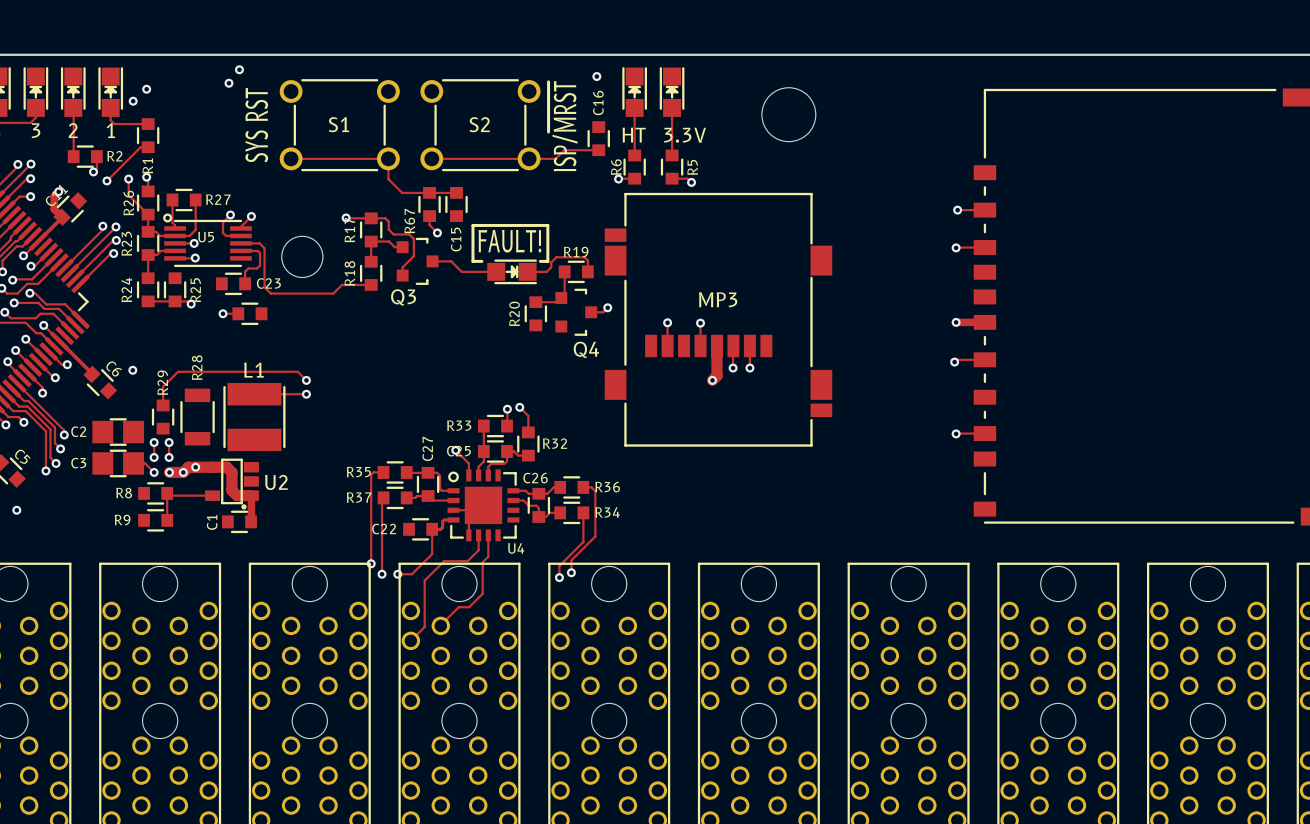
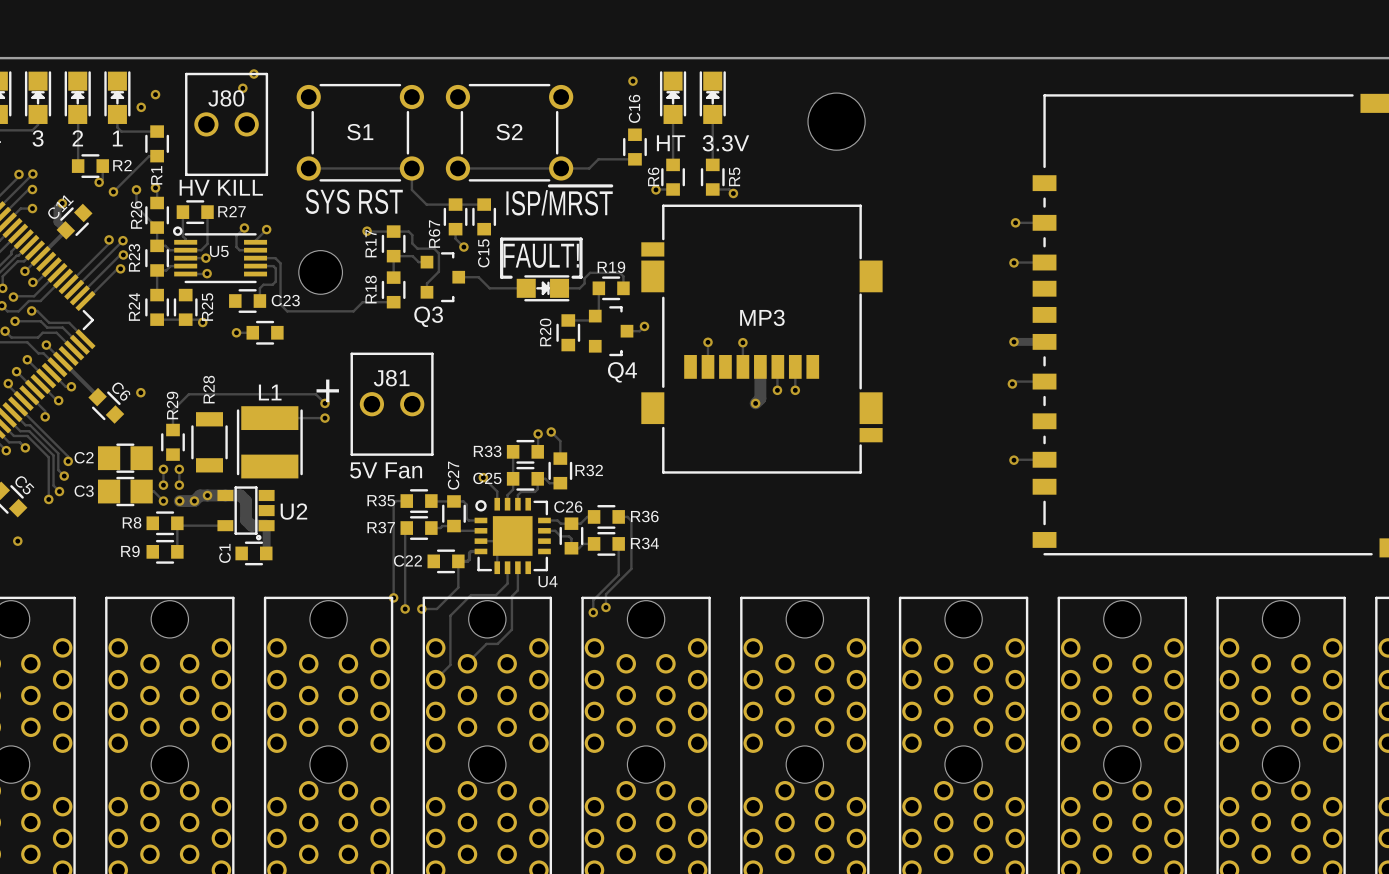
J80: none -> (226, 124)
text rotation: 0° (256, 125) -> 90° clockwise (354, 201)
text rotation: 0° (563, 126) -> 90° clockwise (559, 200)
text: none -> HV KILL (221, 187)
text: none -> + (327, 390)
J81: none -> (392, 404)
text: none -> 5V Fan (386, 470)

